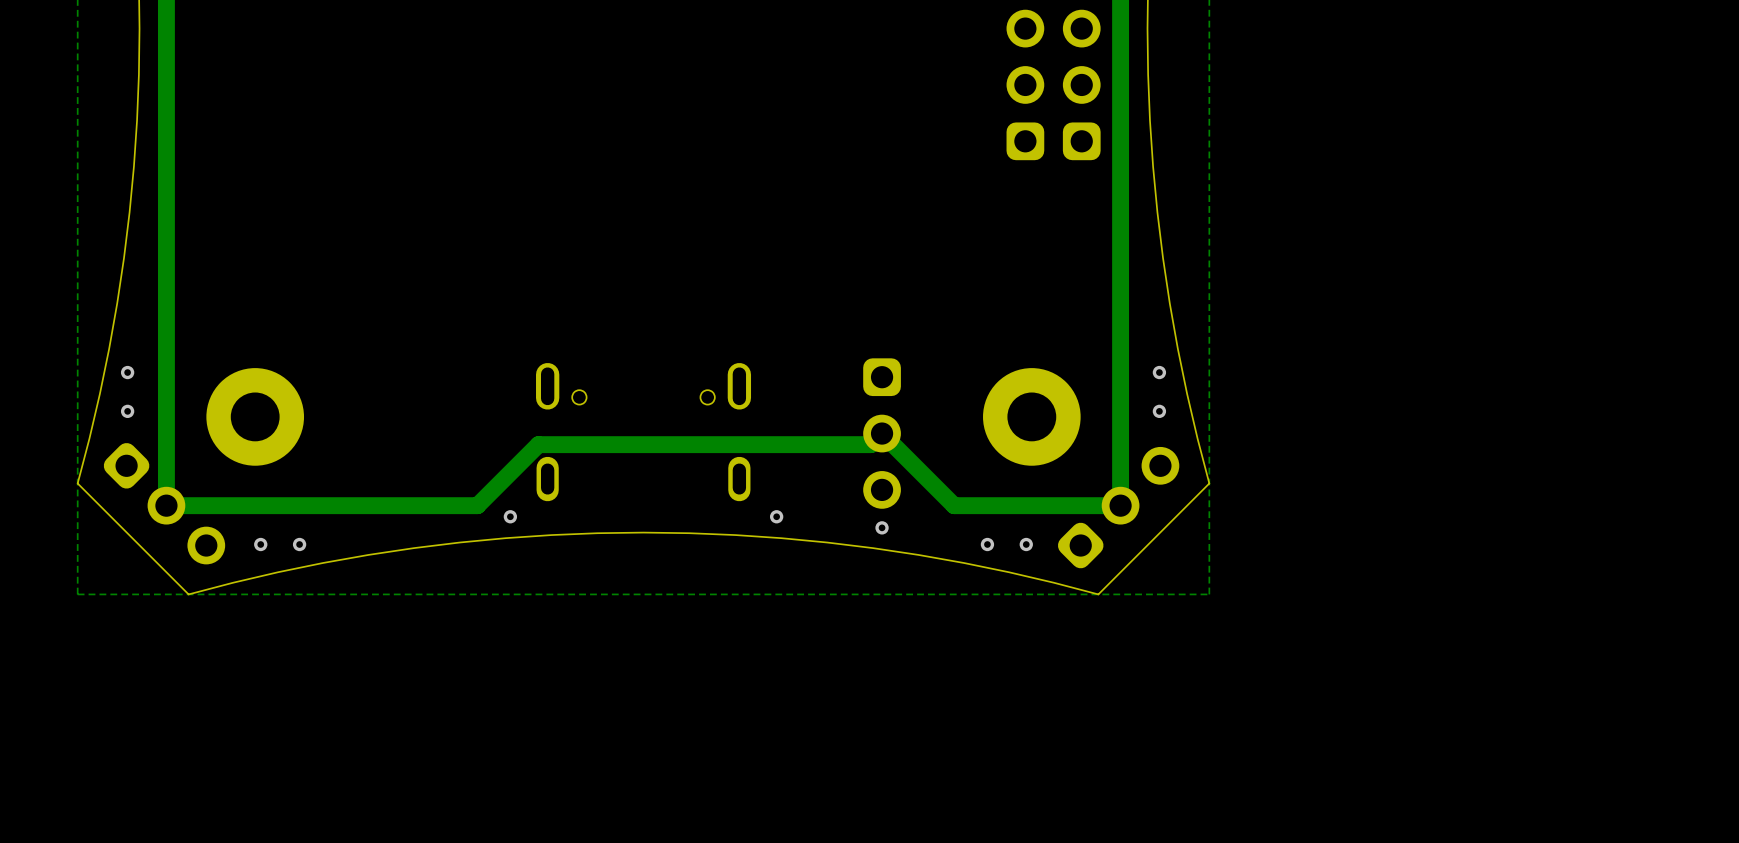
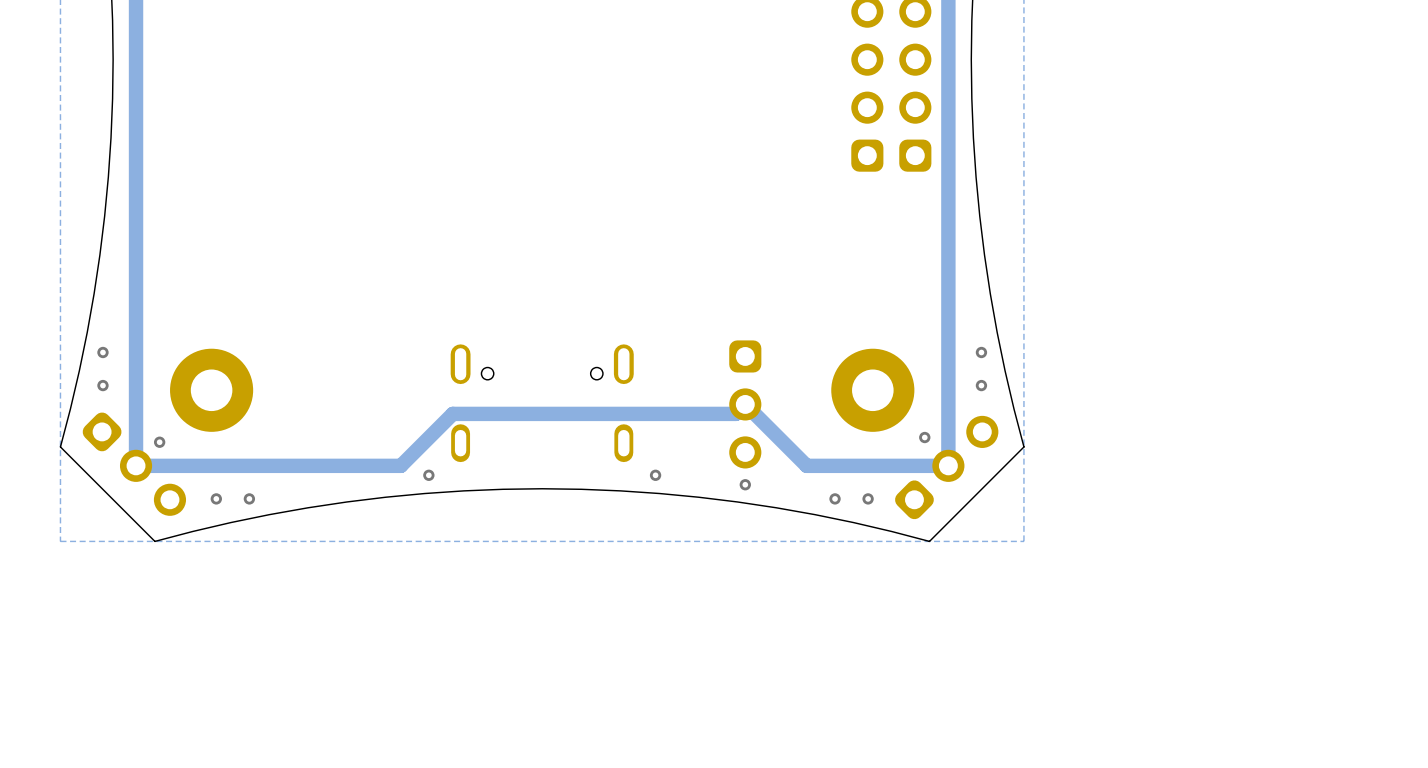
via: none -> (924, 437)
via: none -> (159, 442)

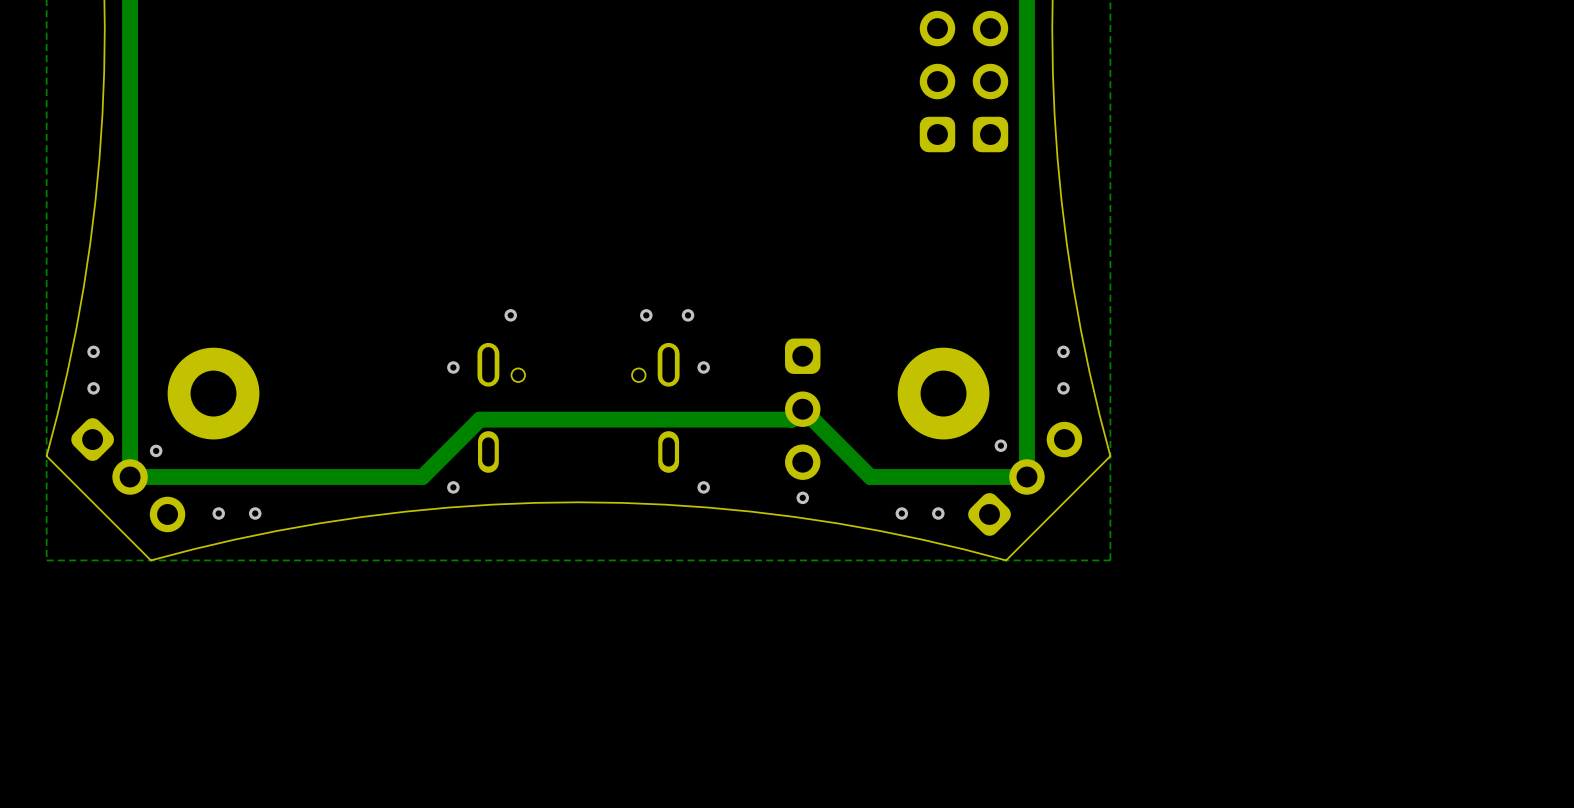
via: none -> (510, 315)
via: none -> (646, 315)
via: none -> (688, 315)
via: none -> (453, 367)
via: none -> (703, 367)

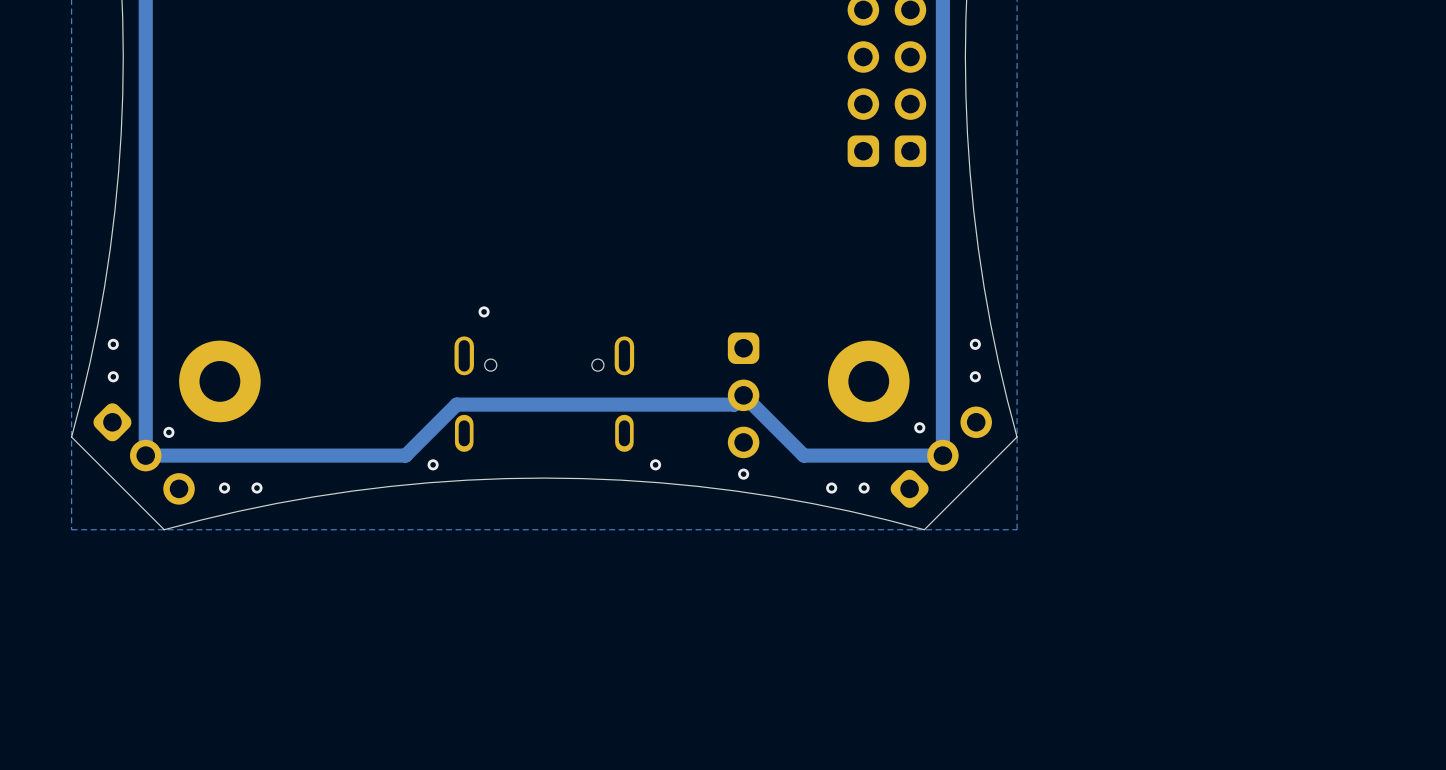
via: (646, 315) -> none
via: (688, 315) -> none
via: (453, 367) -> none
via: (703, 367) -> none

